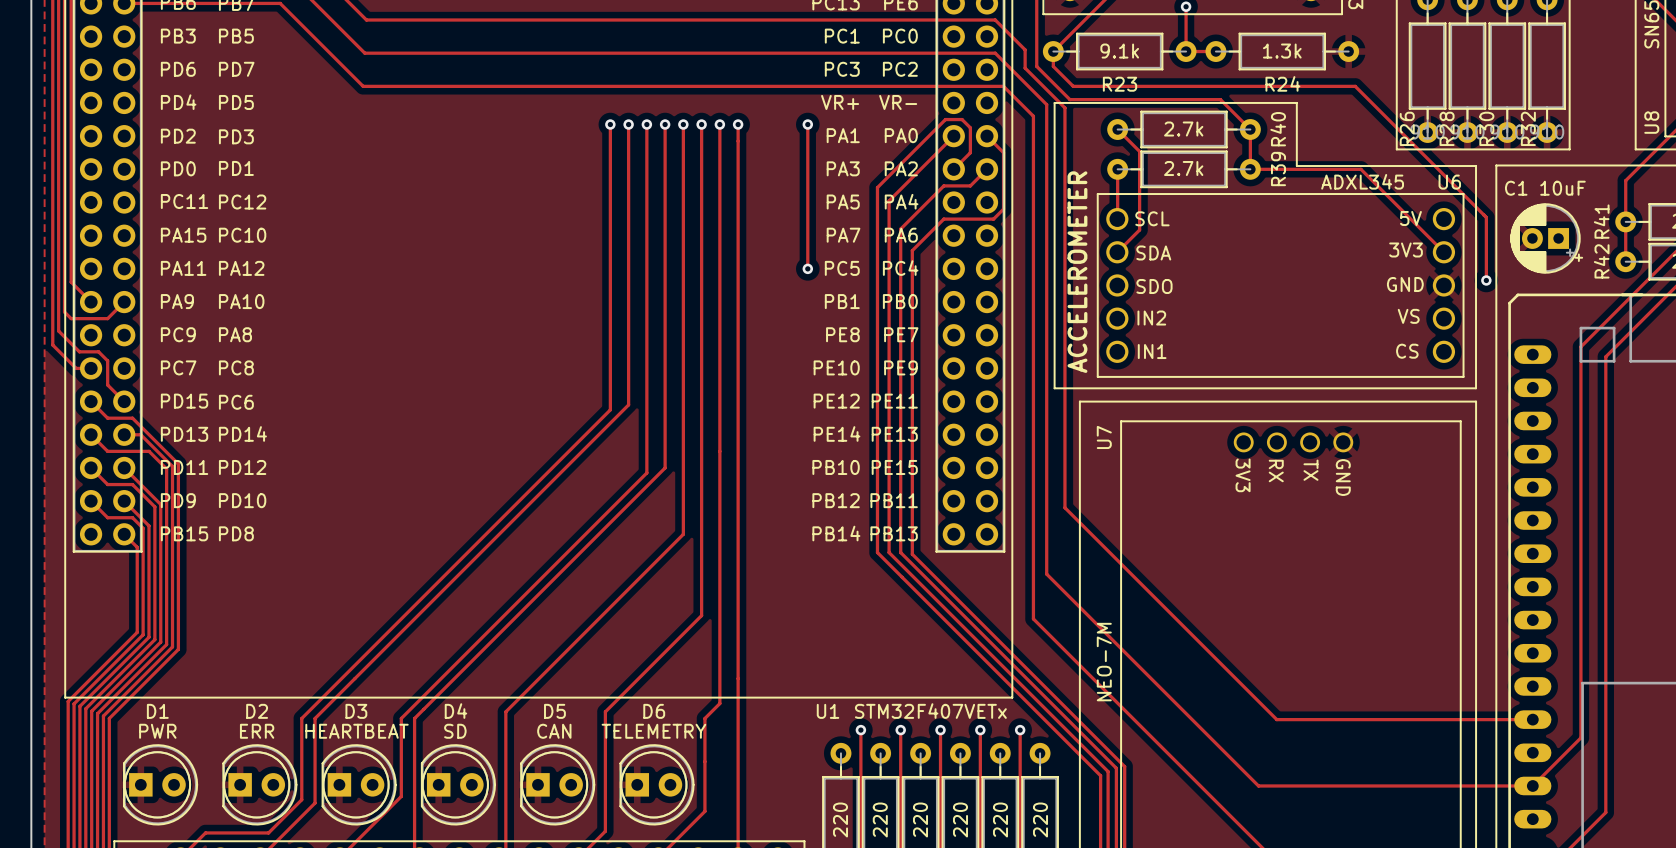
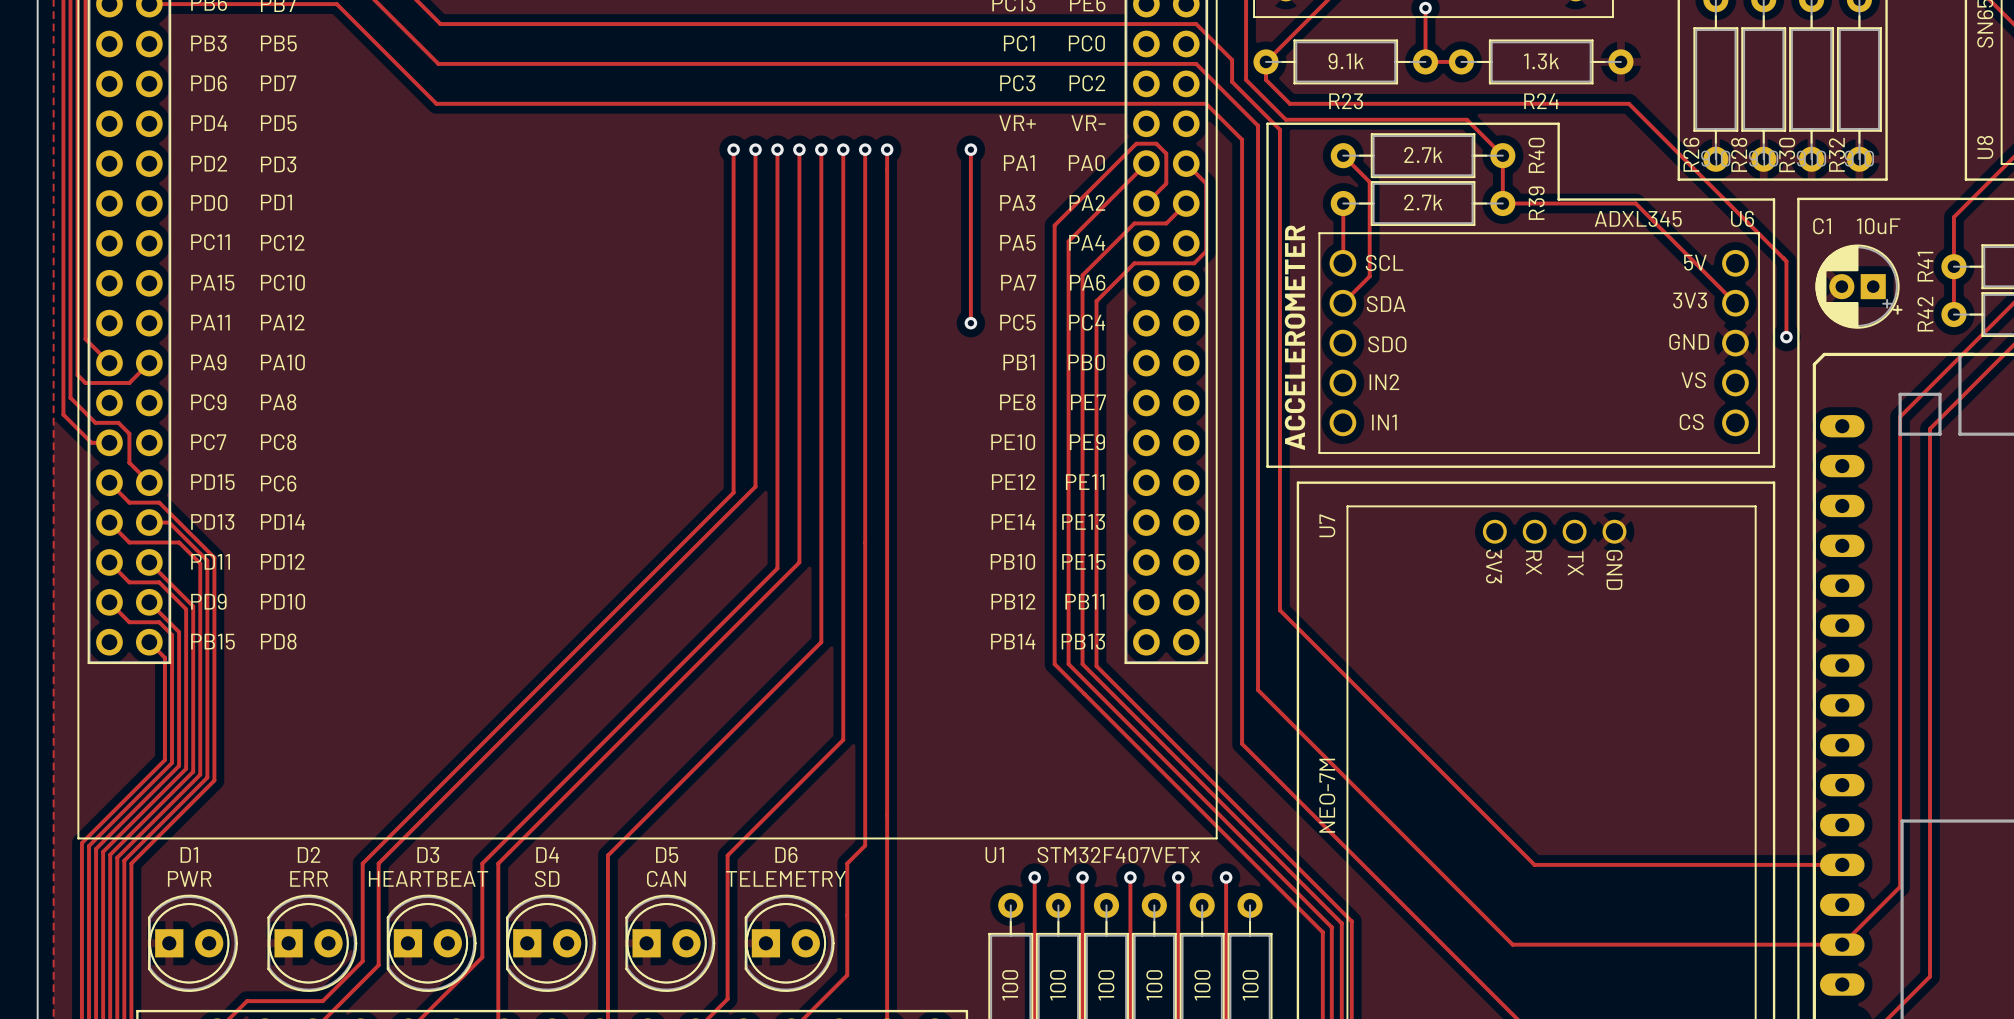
part value: 220 (840, 819) -> 100 (1010, 985)
part value: 220 (880, 819) -> 100 (1058, 985)
part value: 220 (920, 819) -> 100 (1106, 985)
part value: 220 (960, 819) -> 100 (1154, 985)
part value: 220 (1000, 819) -> 100 (1202, 985)
part value: 220 (1040, 819) -> 100 (1250, 985)

